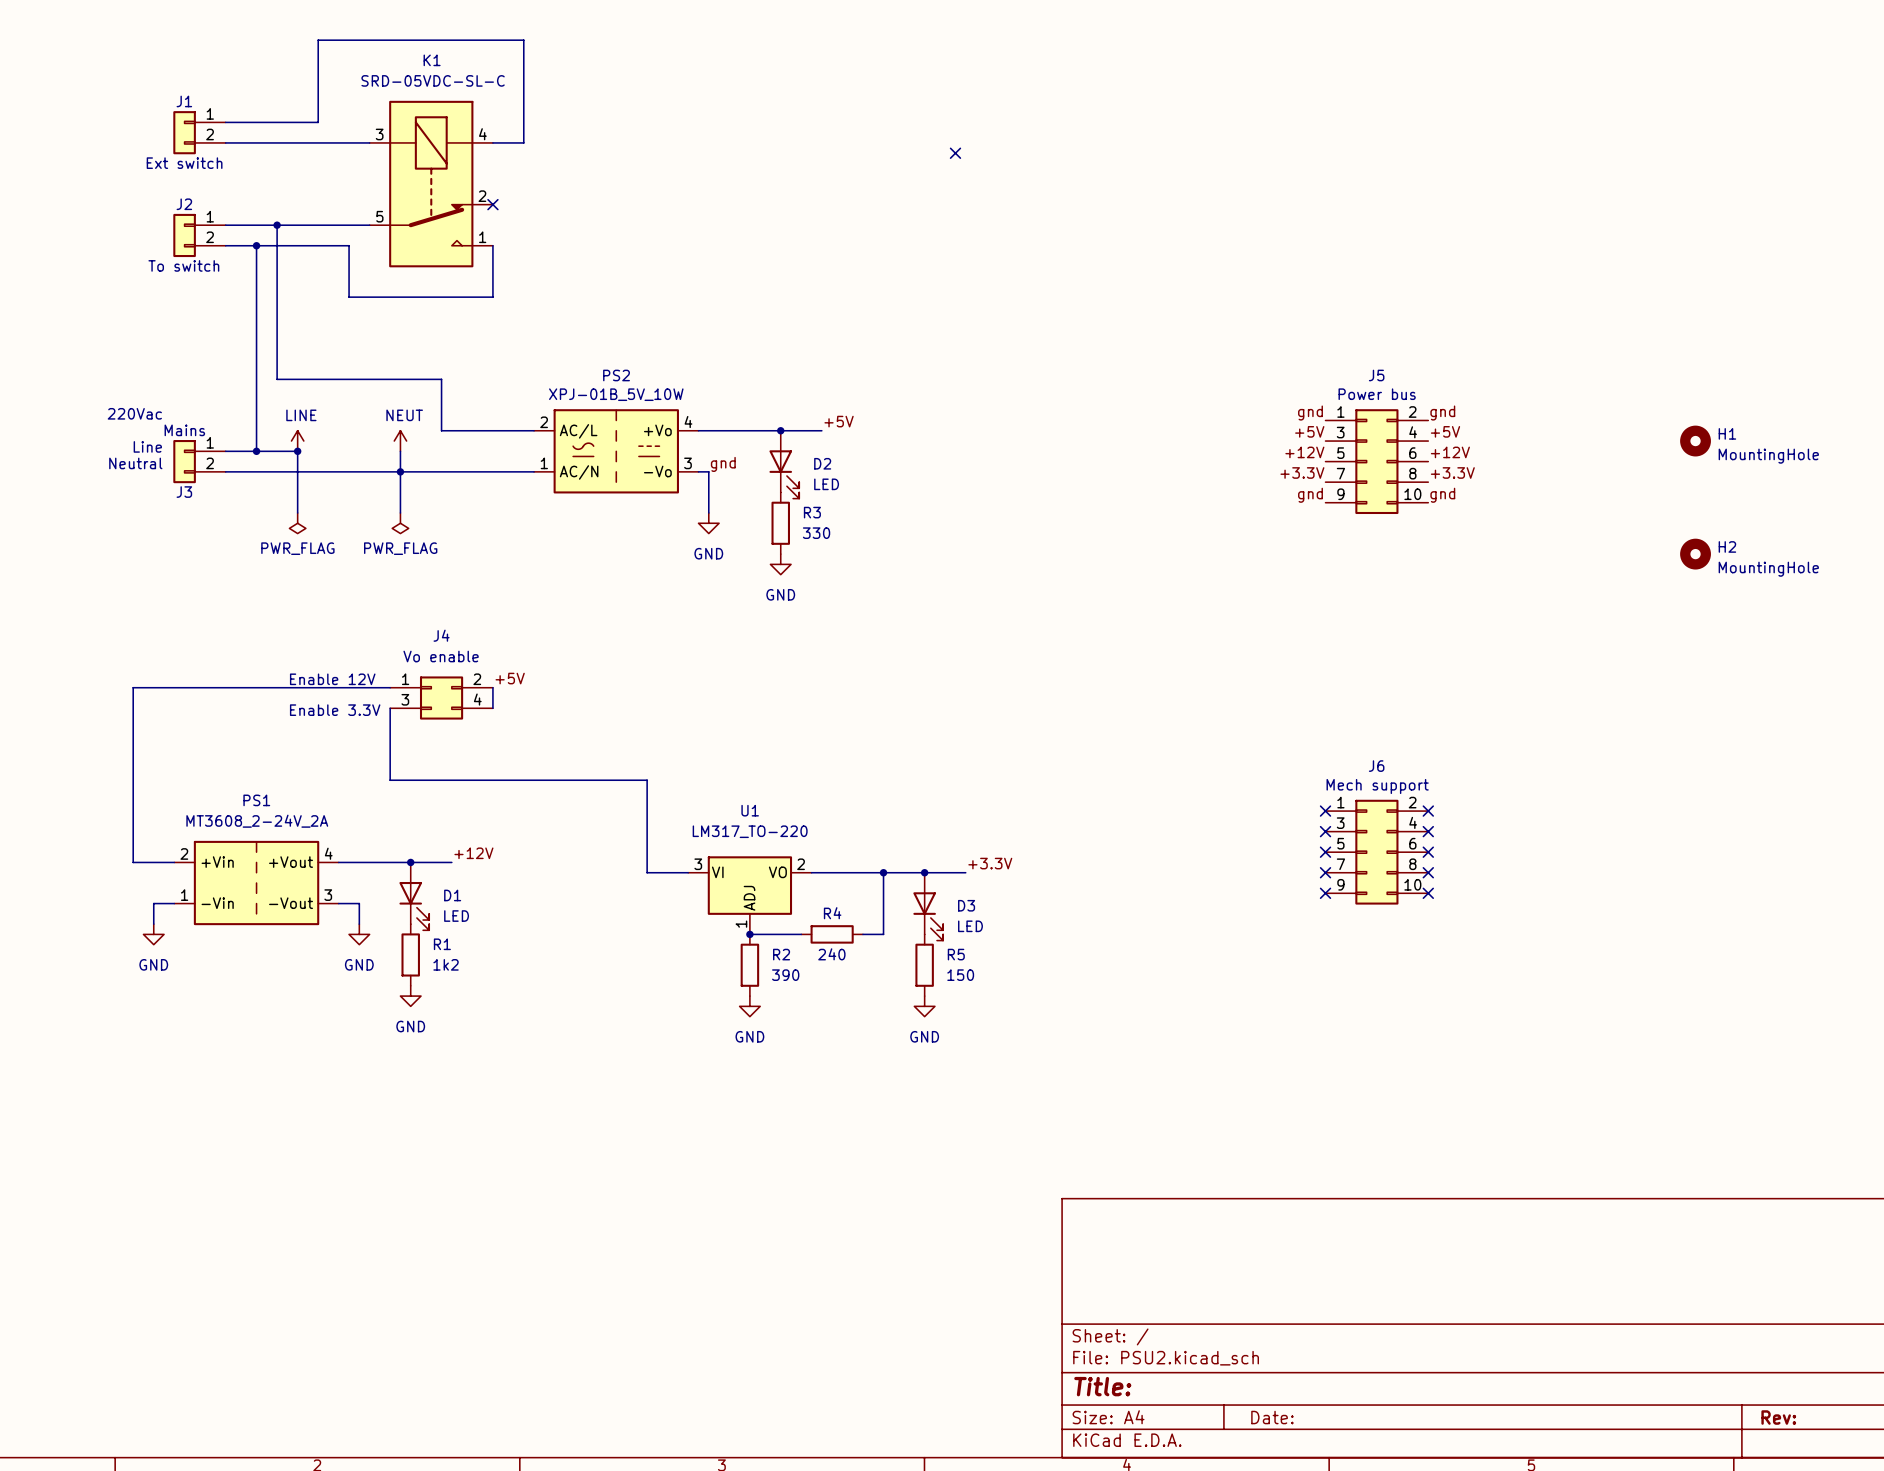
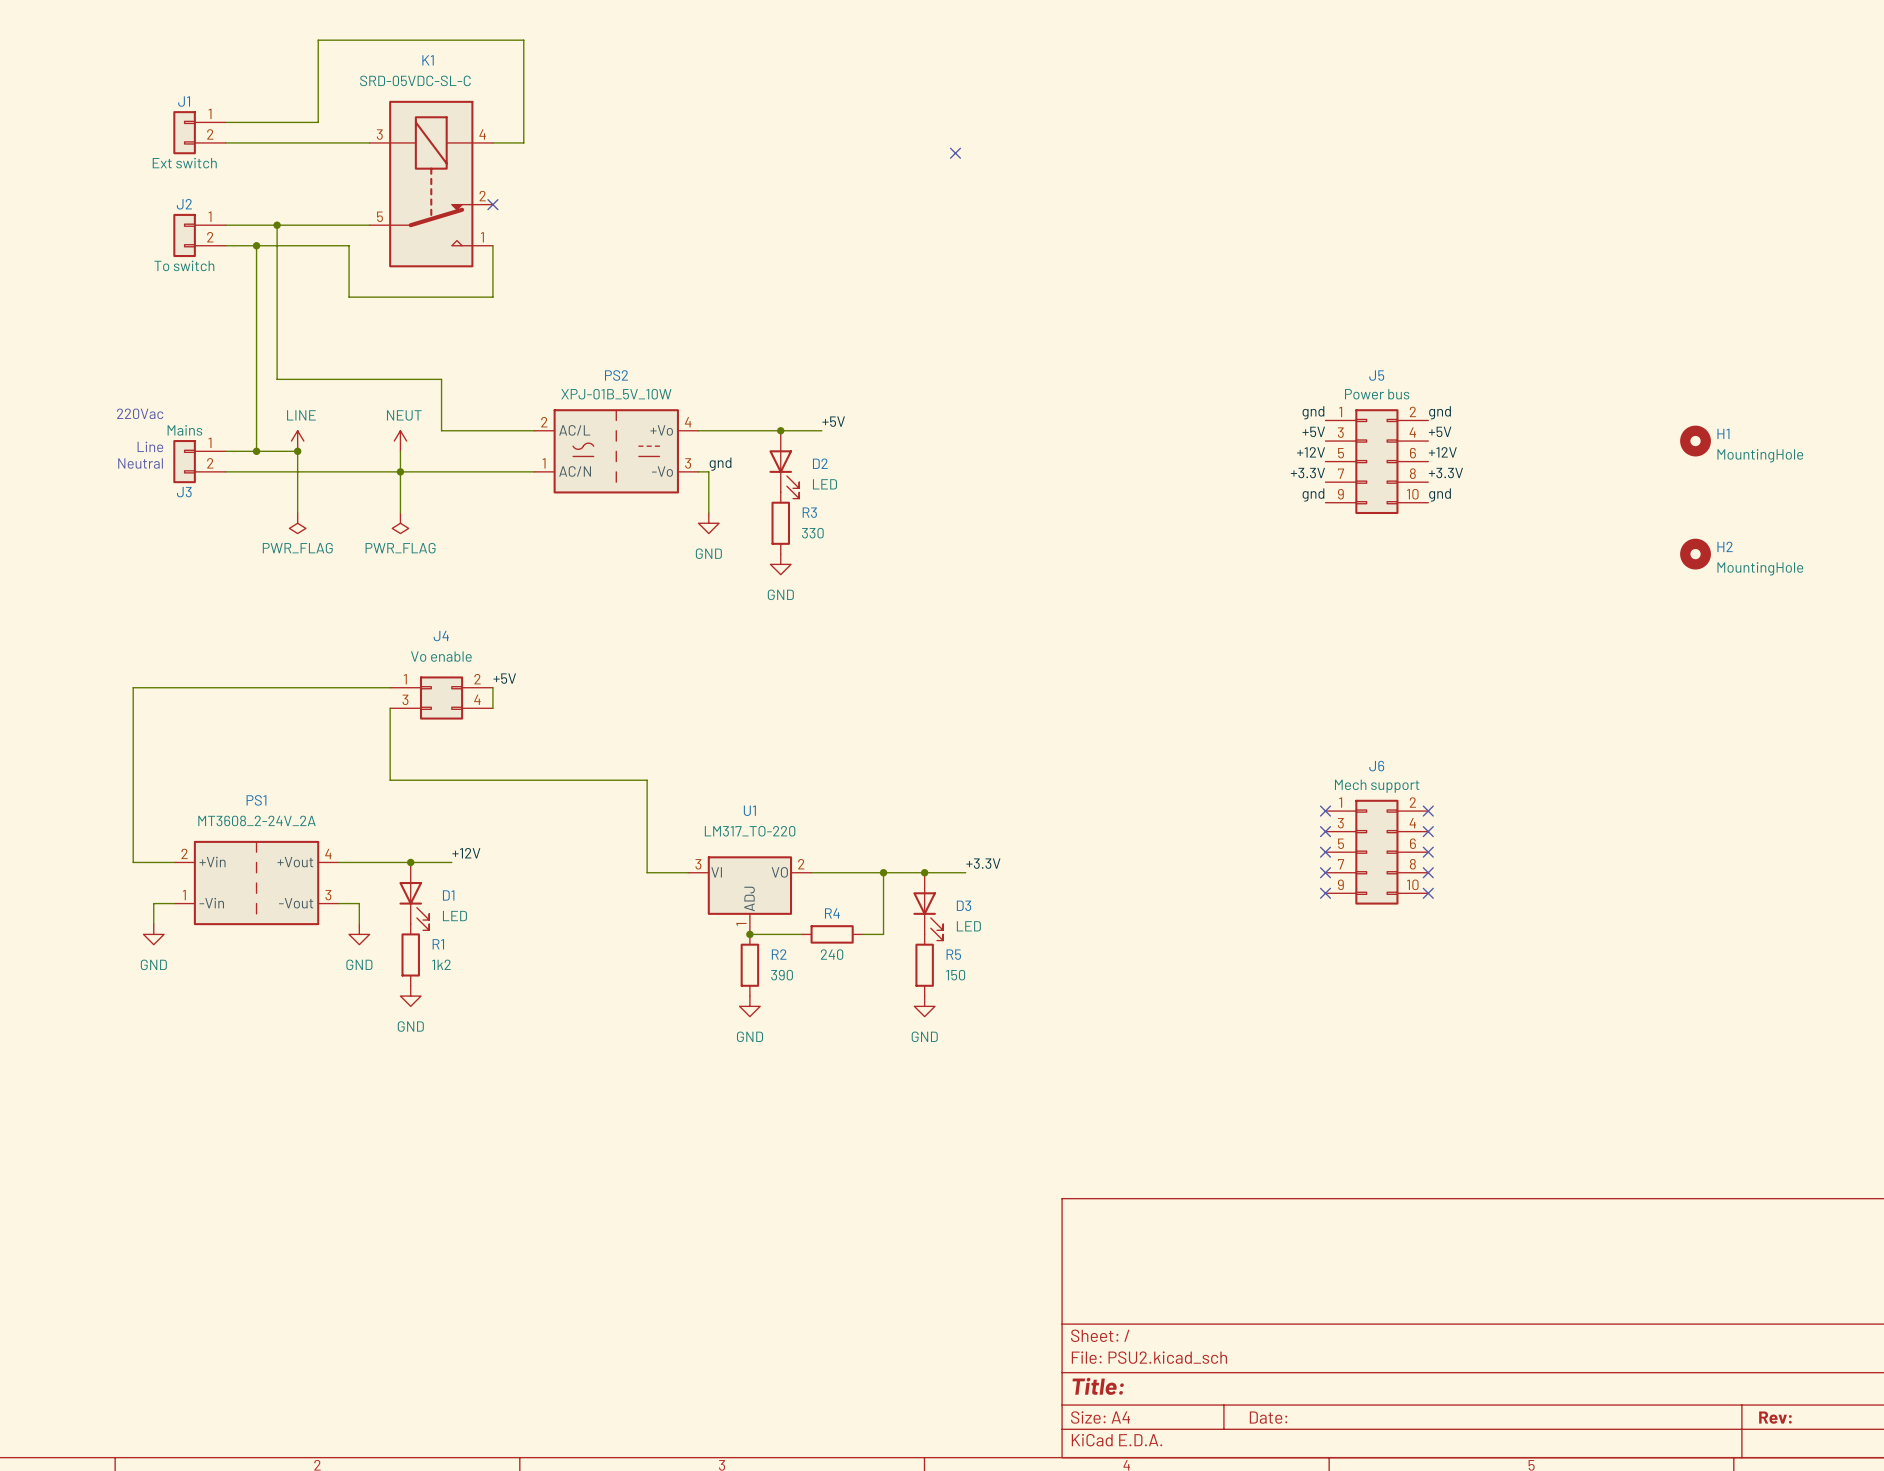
text: Enable 12V (332, 679) -> none
text: Enable 3.3V (335, 710) -> none

